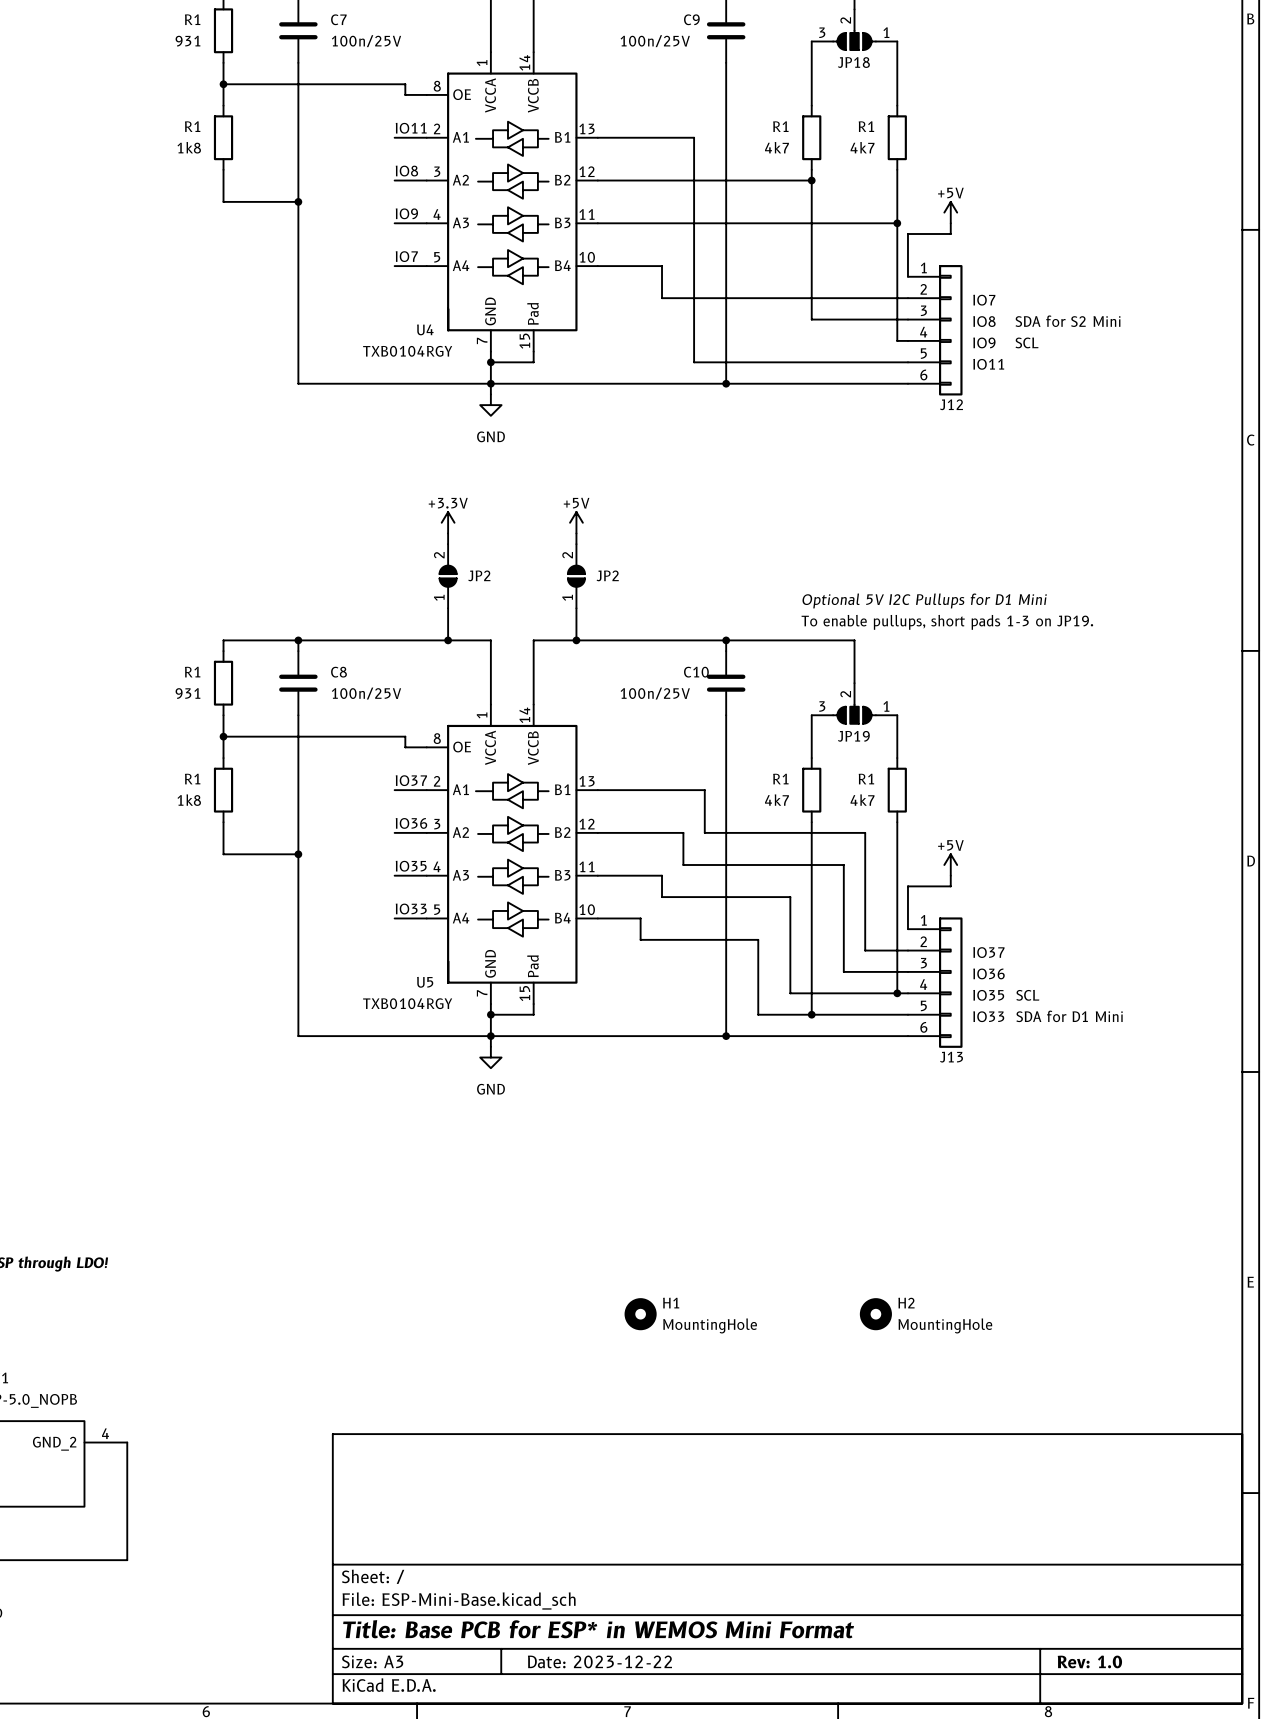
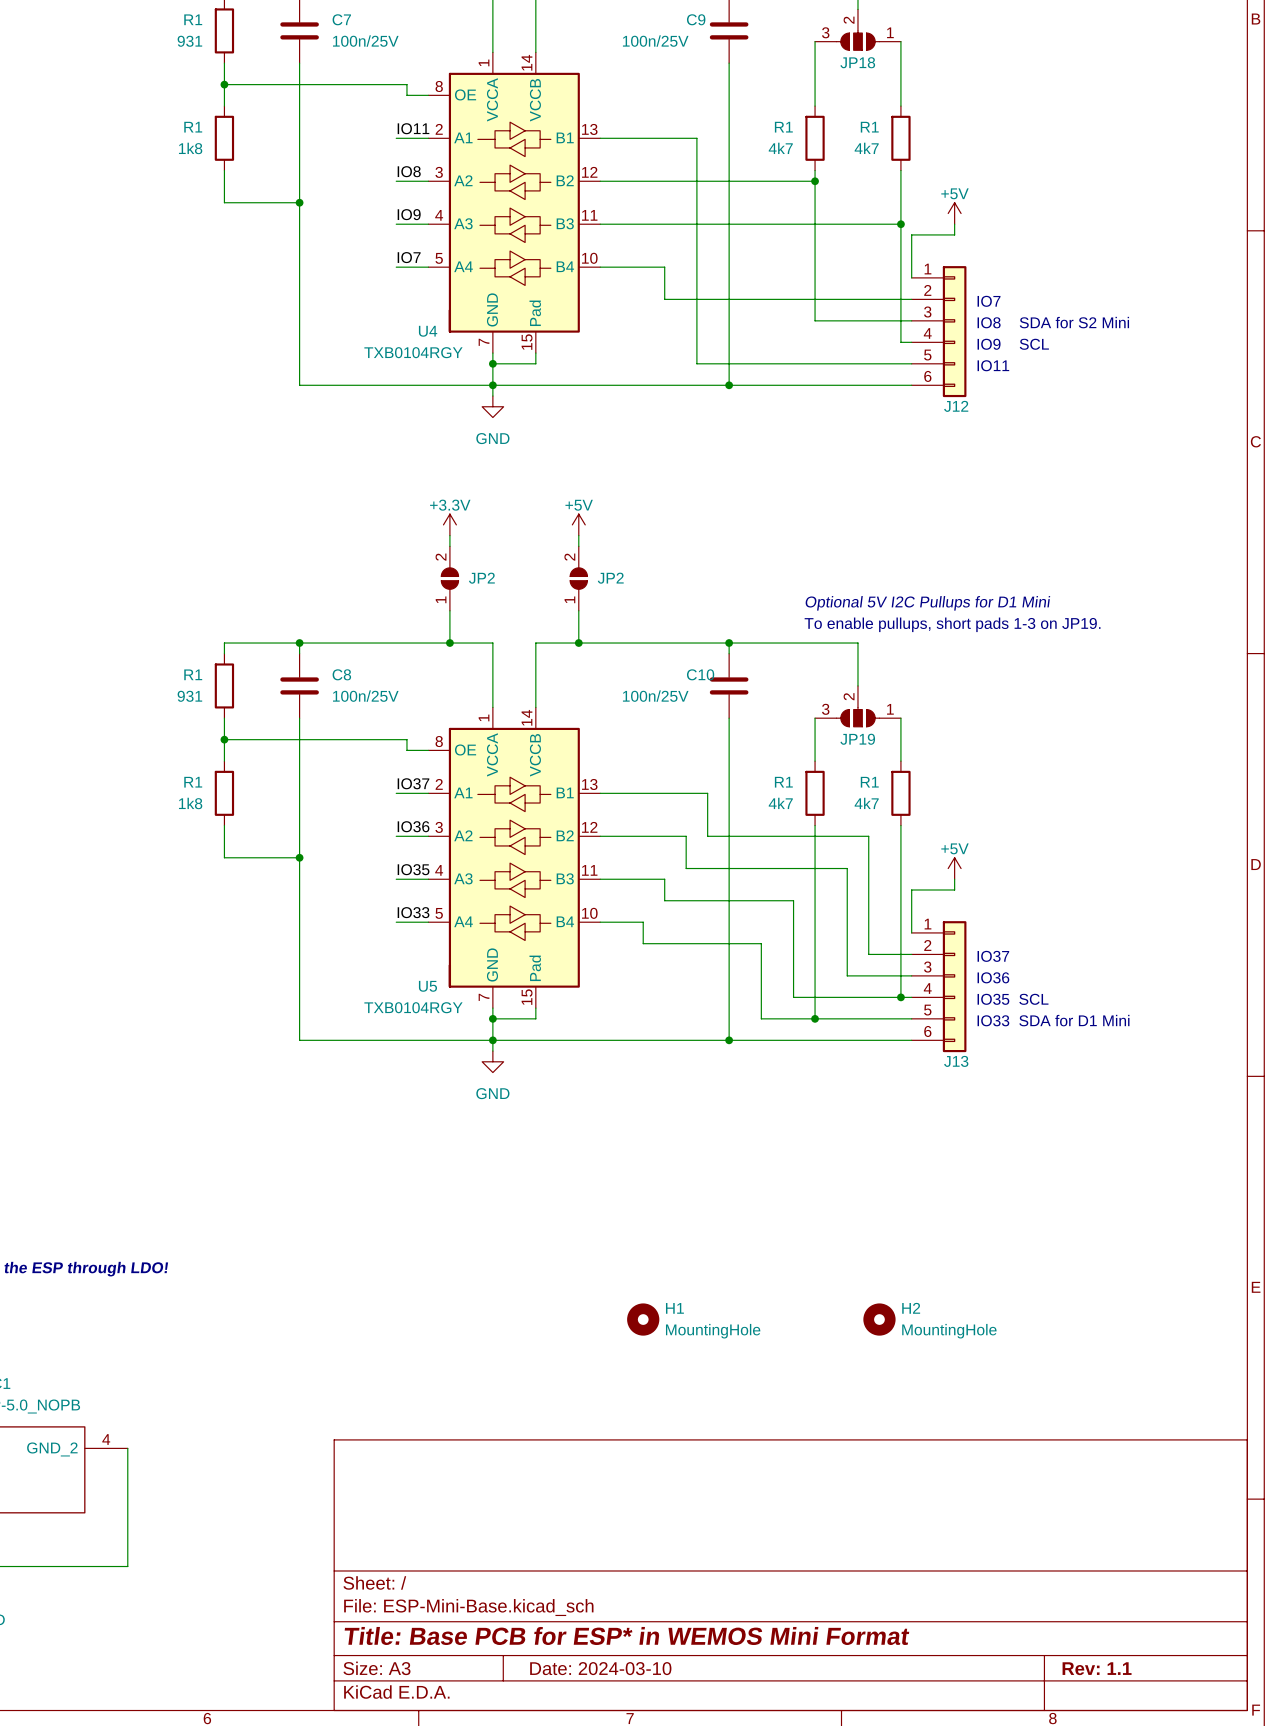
title block: Date: 2023-12-22 (599, 1661) -> Date: 2024-03-10 (600, 1668)
title block: Rev: 1.0 (1089, 1661) -> Rev: 1.1 (1097, 1668)

